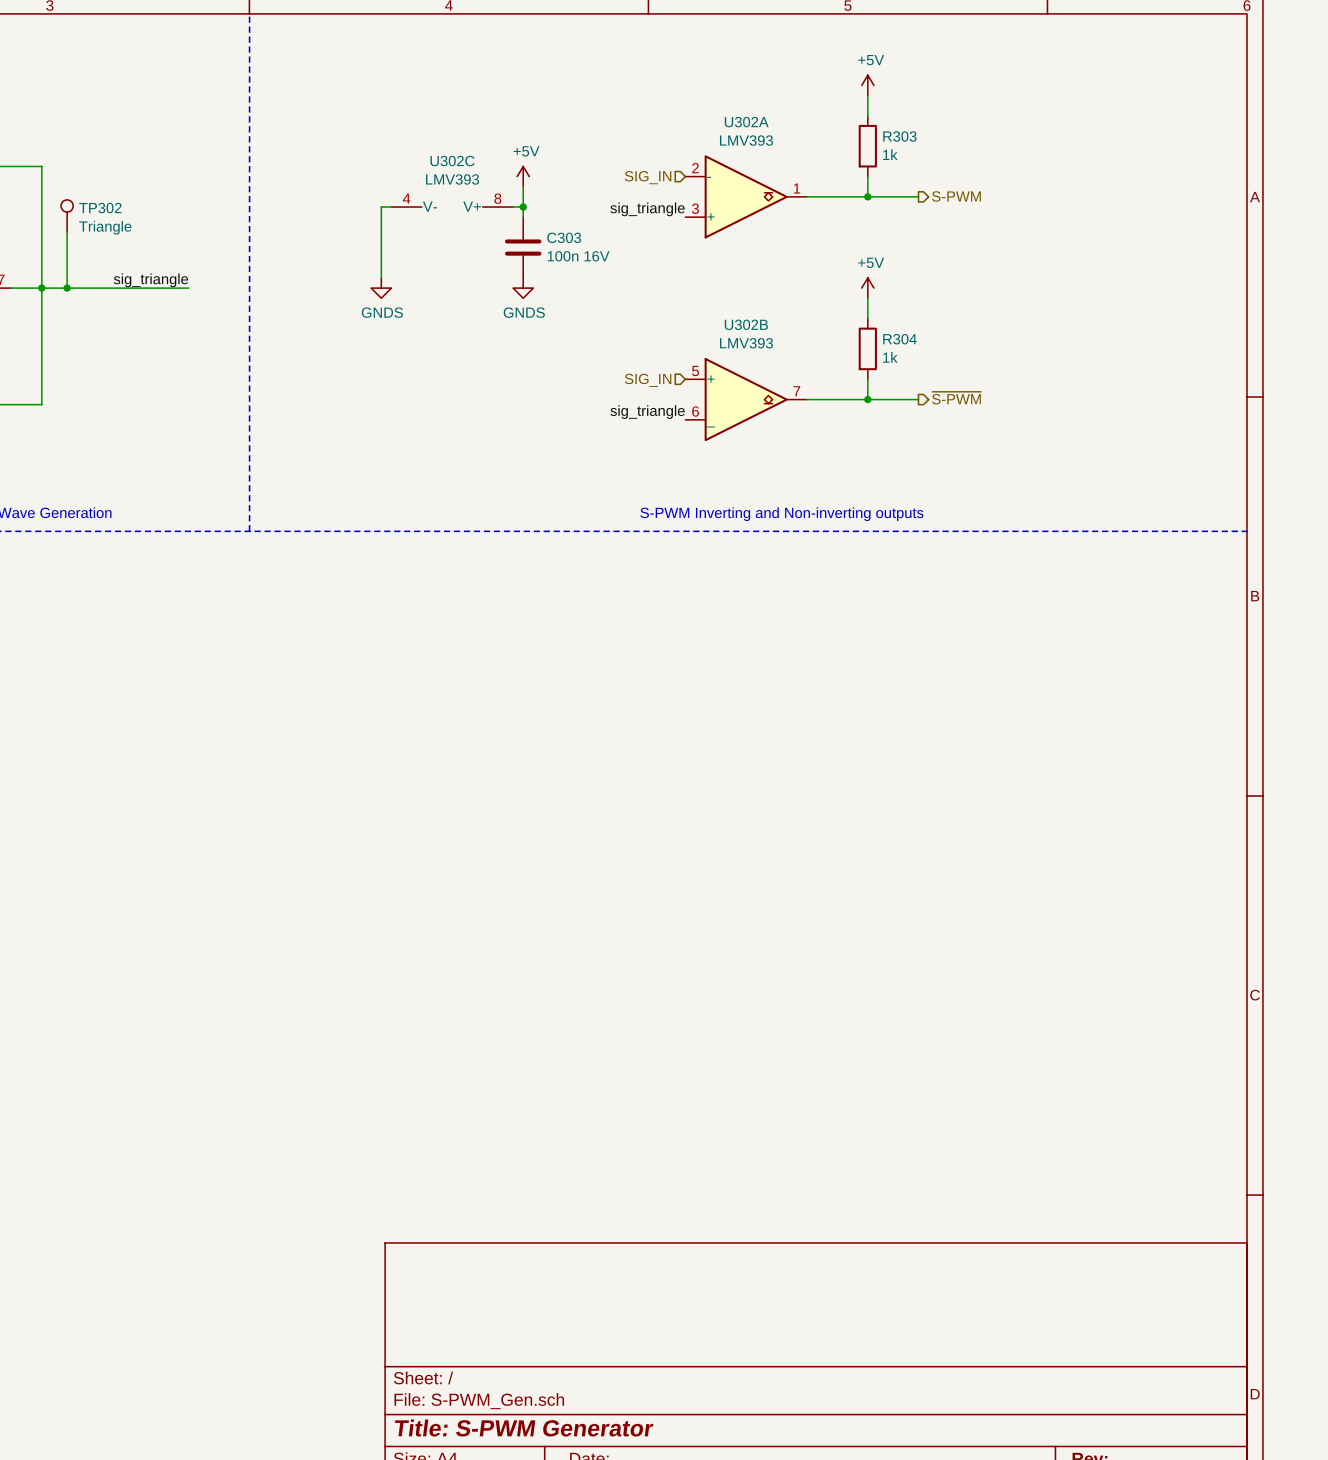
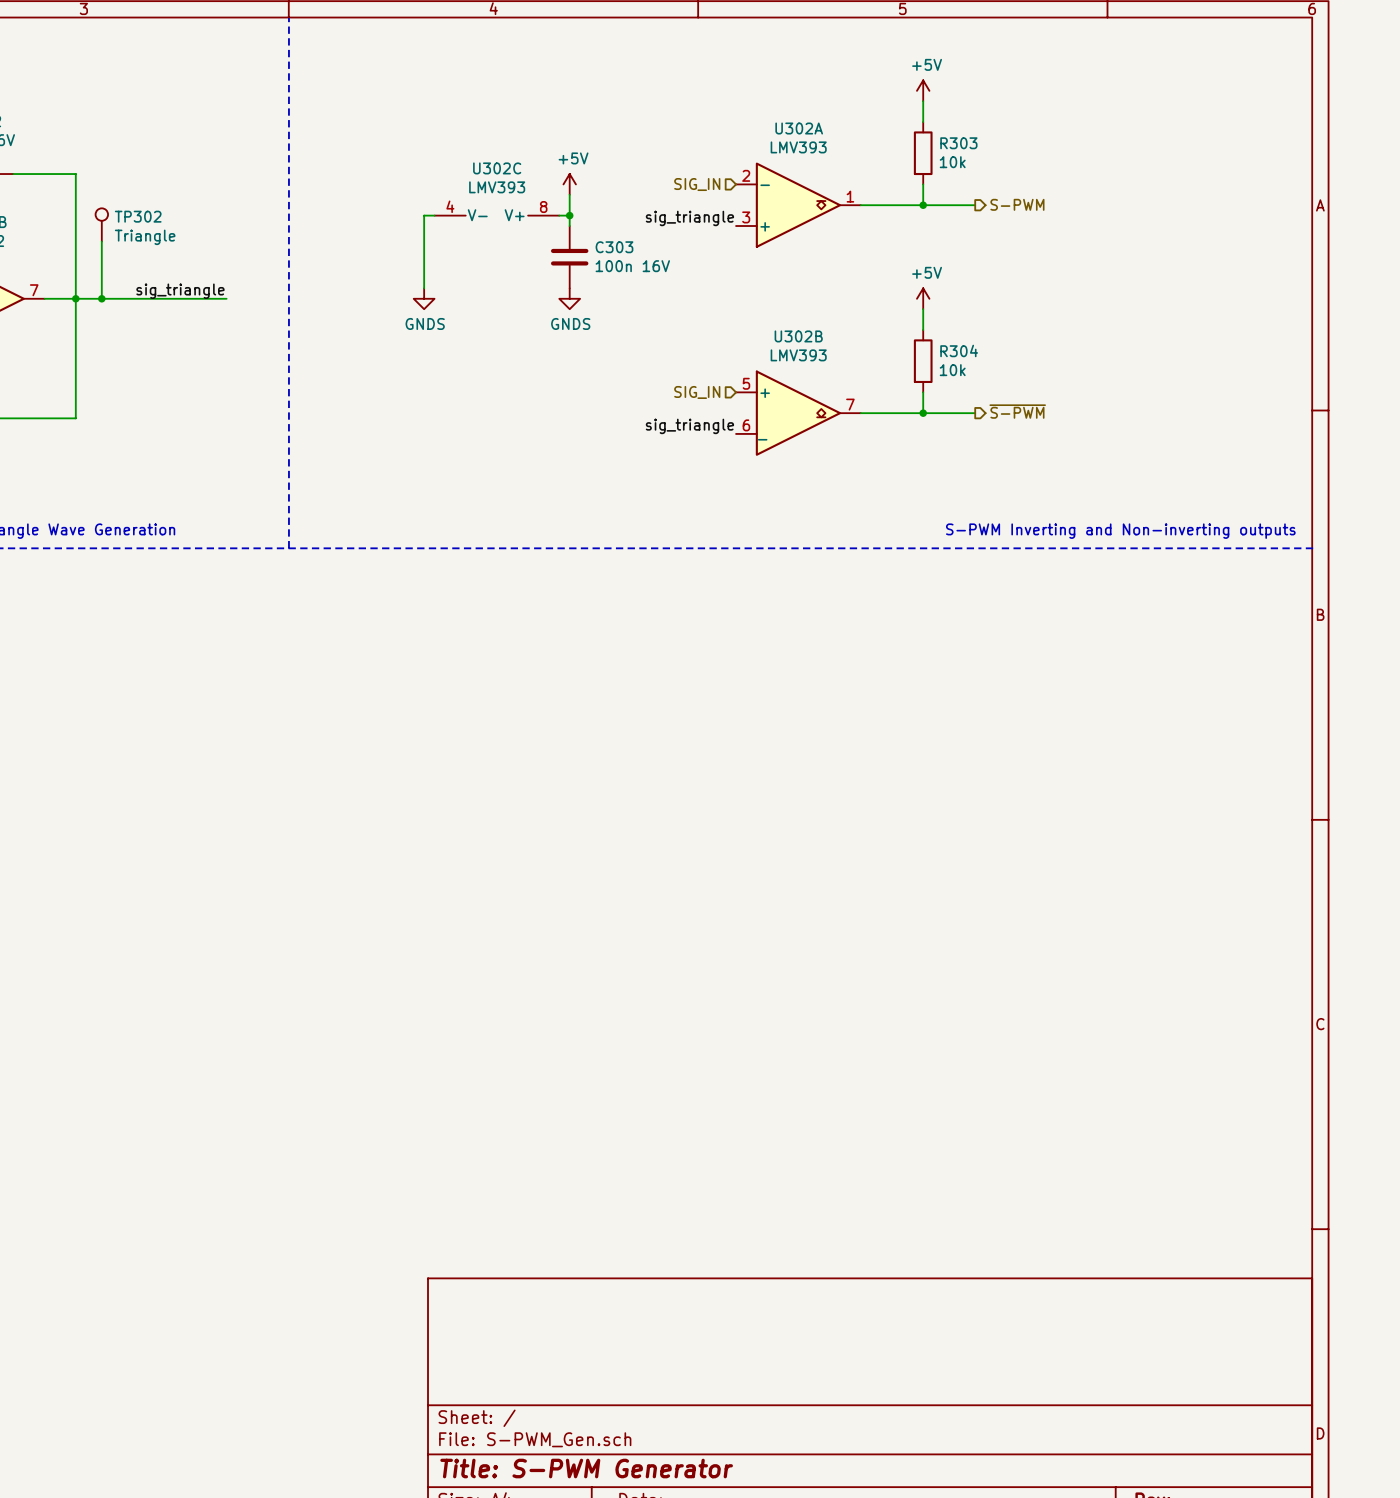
R303 value: 1k (890, 154) -> 10k (952, 162)
R304 value: 1k (890, 357) -> 10k (952, 370)
text: S-PWM Inverting and Non-inverting outputs (781, 514) -> none
text: none -> S-PWM Inverting and Non-inverting outputs (1120, 531)

